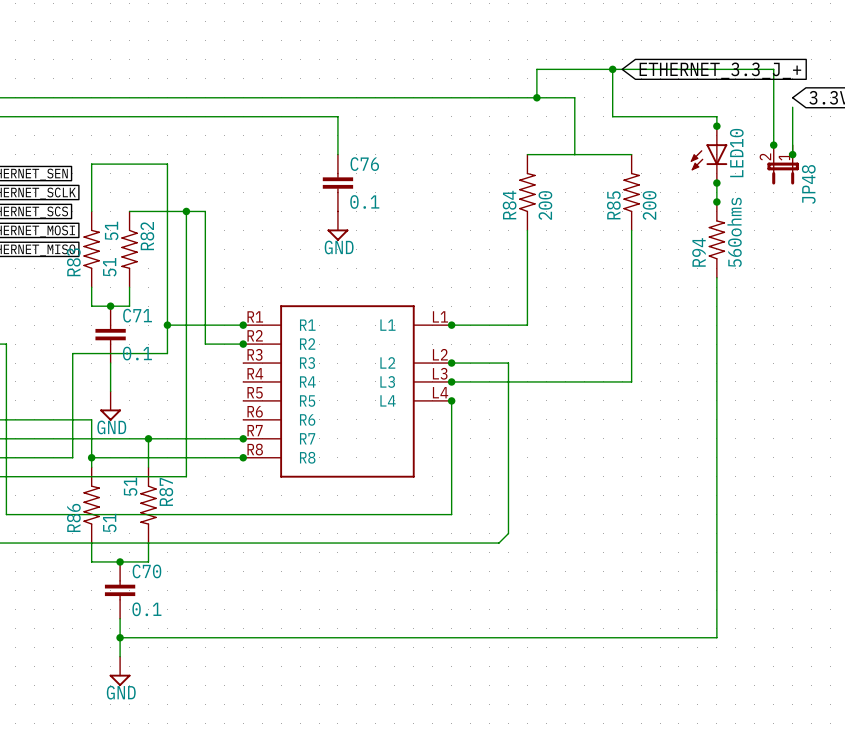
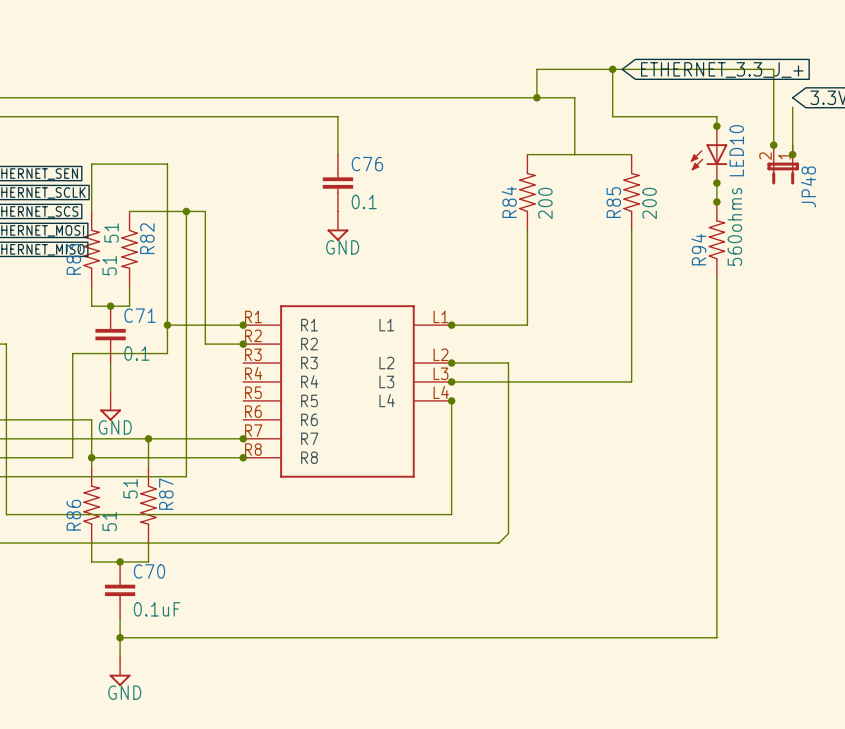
C70 value: 0.1 (146, 609) -> 0.1uF (157, 609)

